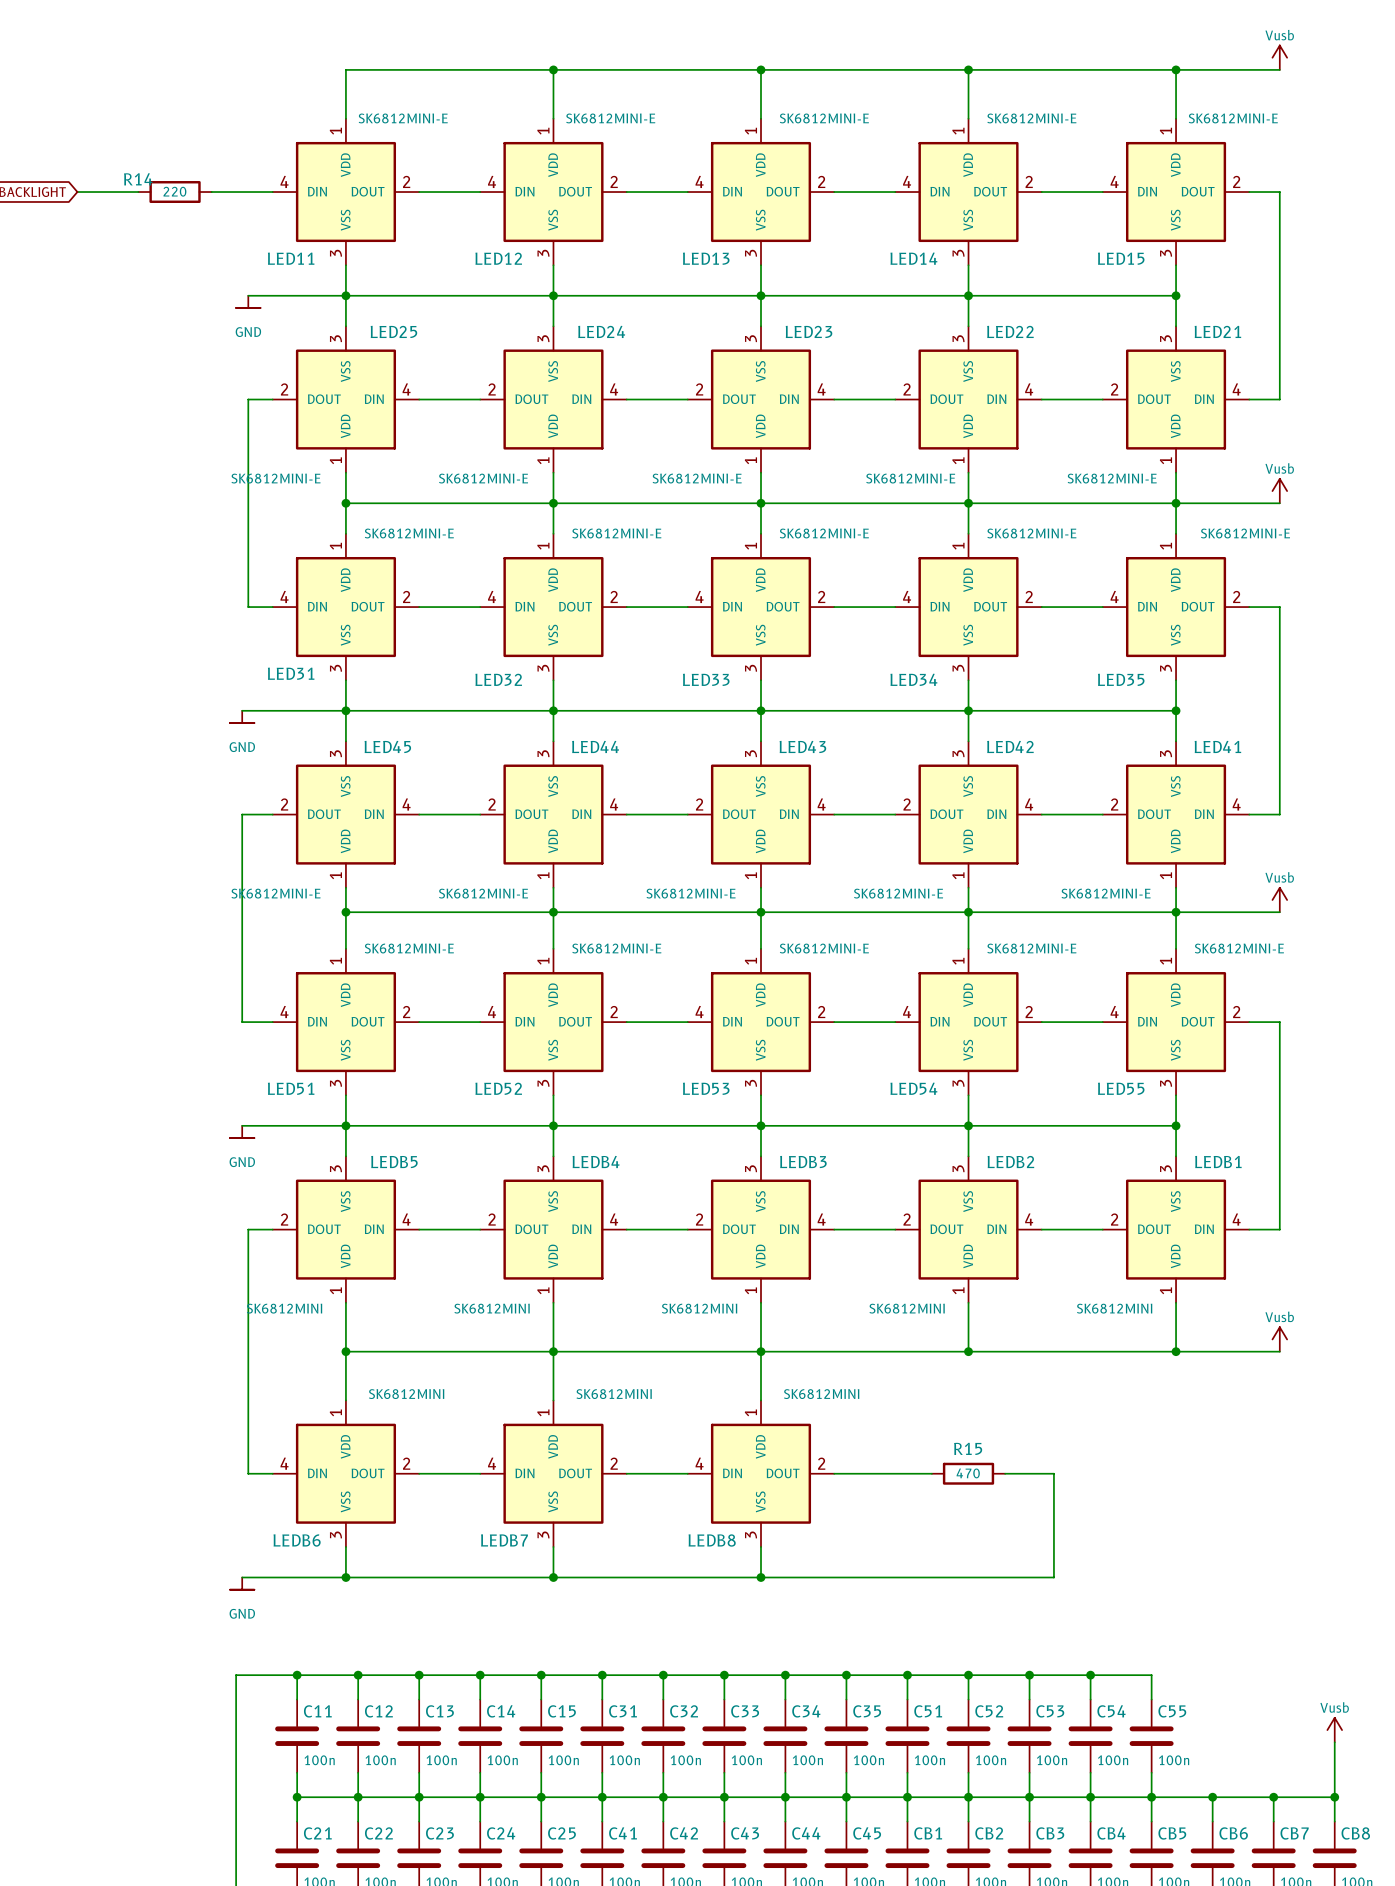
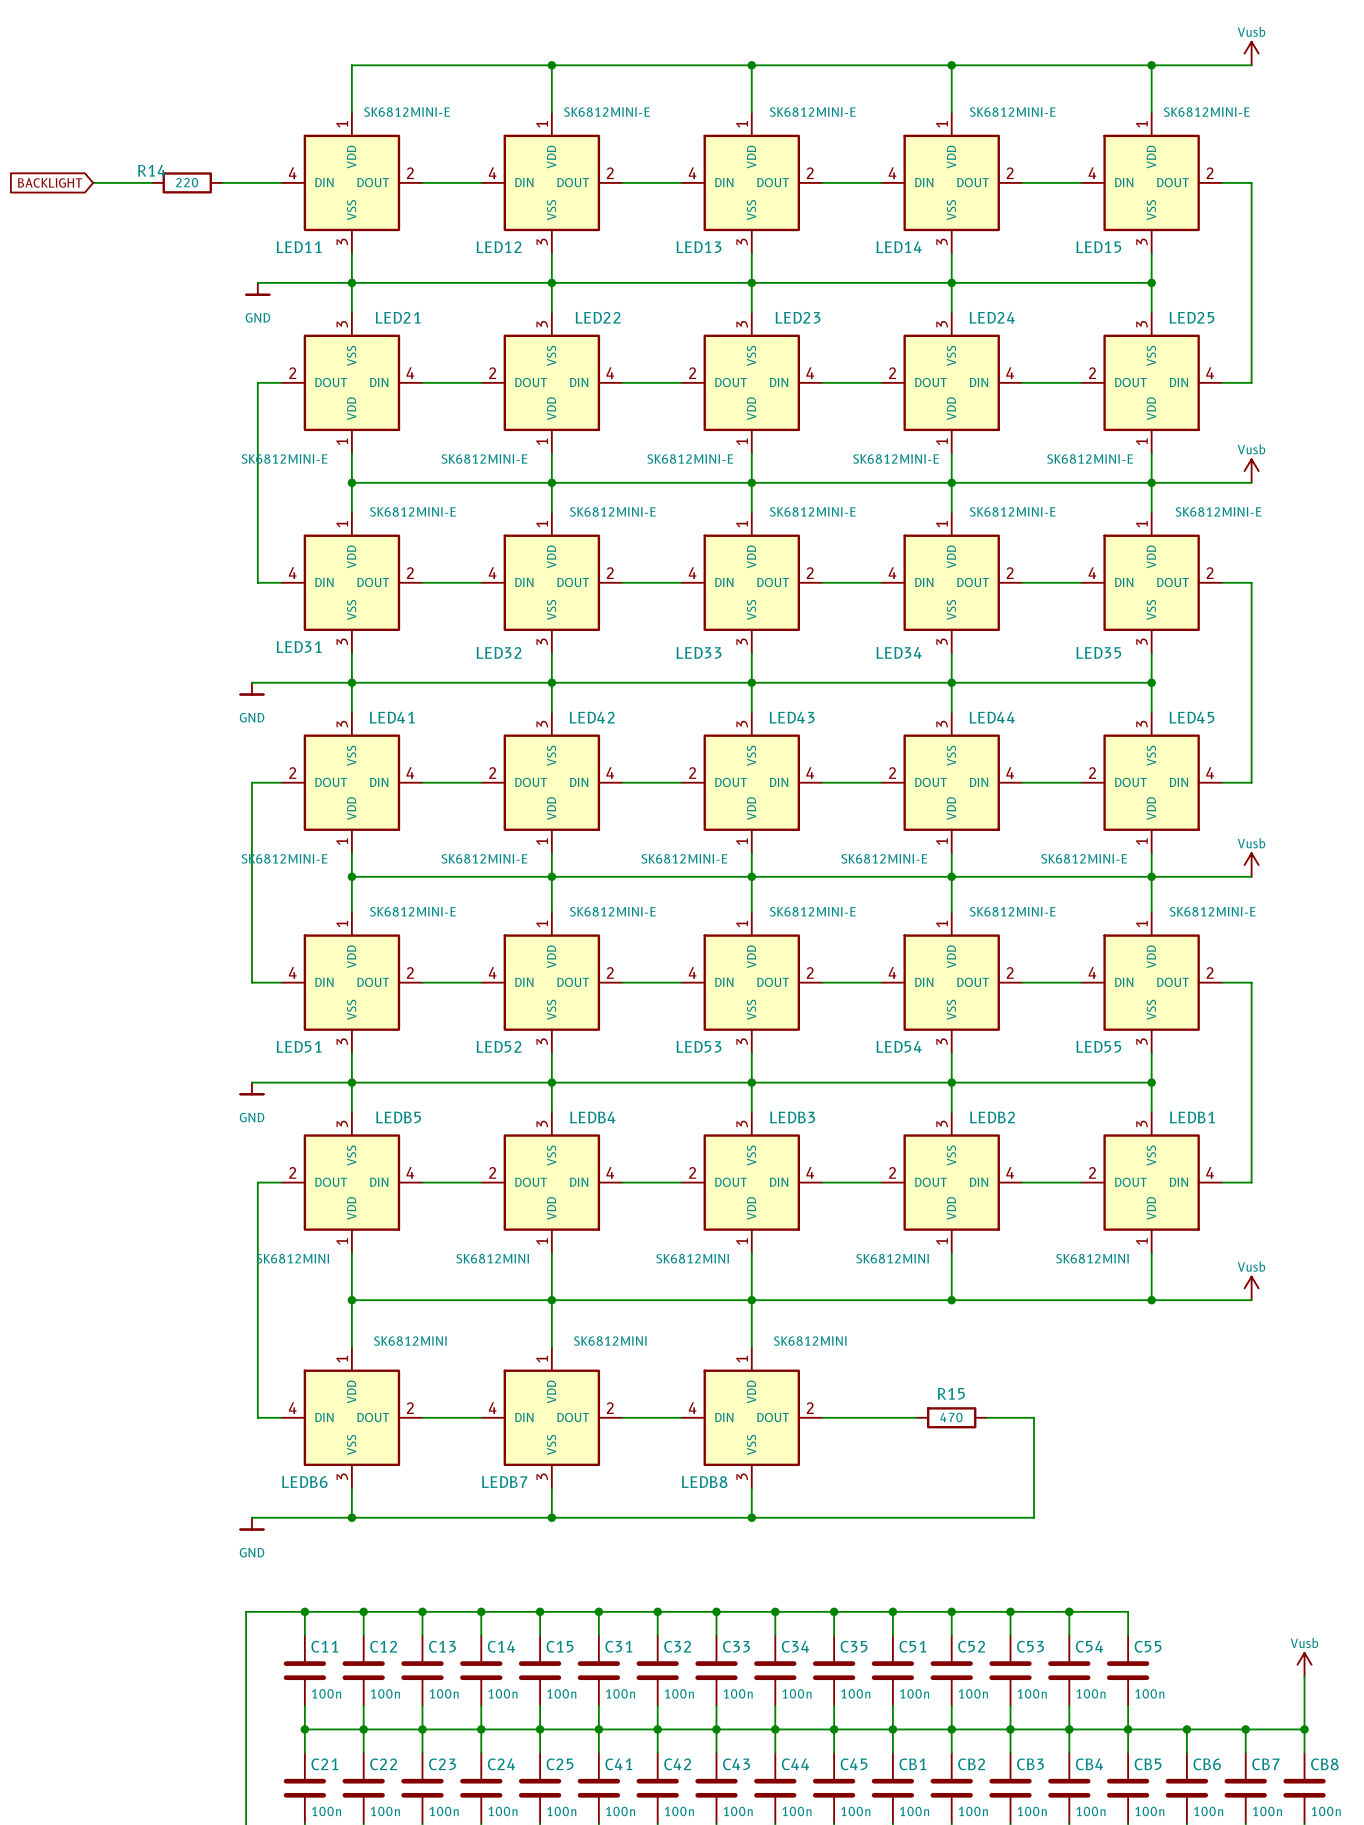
LED25 name: LED25 (393, 331) -> LED21 (398, 317)
LED24 name: LED24 (601, 331) -> LED22 (598, 317)
LED22 name: LED22 (1010, 331) -> LED24 (992, 317)
LED21 name: LED21 (1217, 331) -> LED25 (1191, 317)
LED45 name: LED45 (387, 746) -> LED41 (392, 717)
LED44 name: LED44 (595, 746) -> LED42 (592, 717)
LED42 name: LED42 (1010, 746) -> LED44 (992, 717)
LED41 name: LED41 (1217, 746) -> LED45 (1191, 717)

